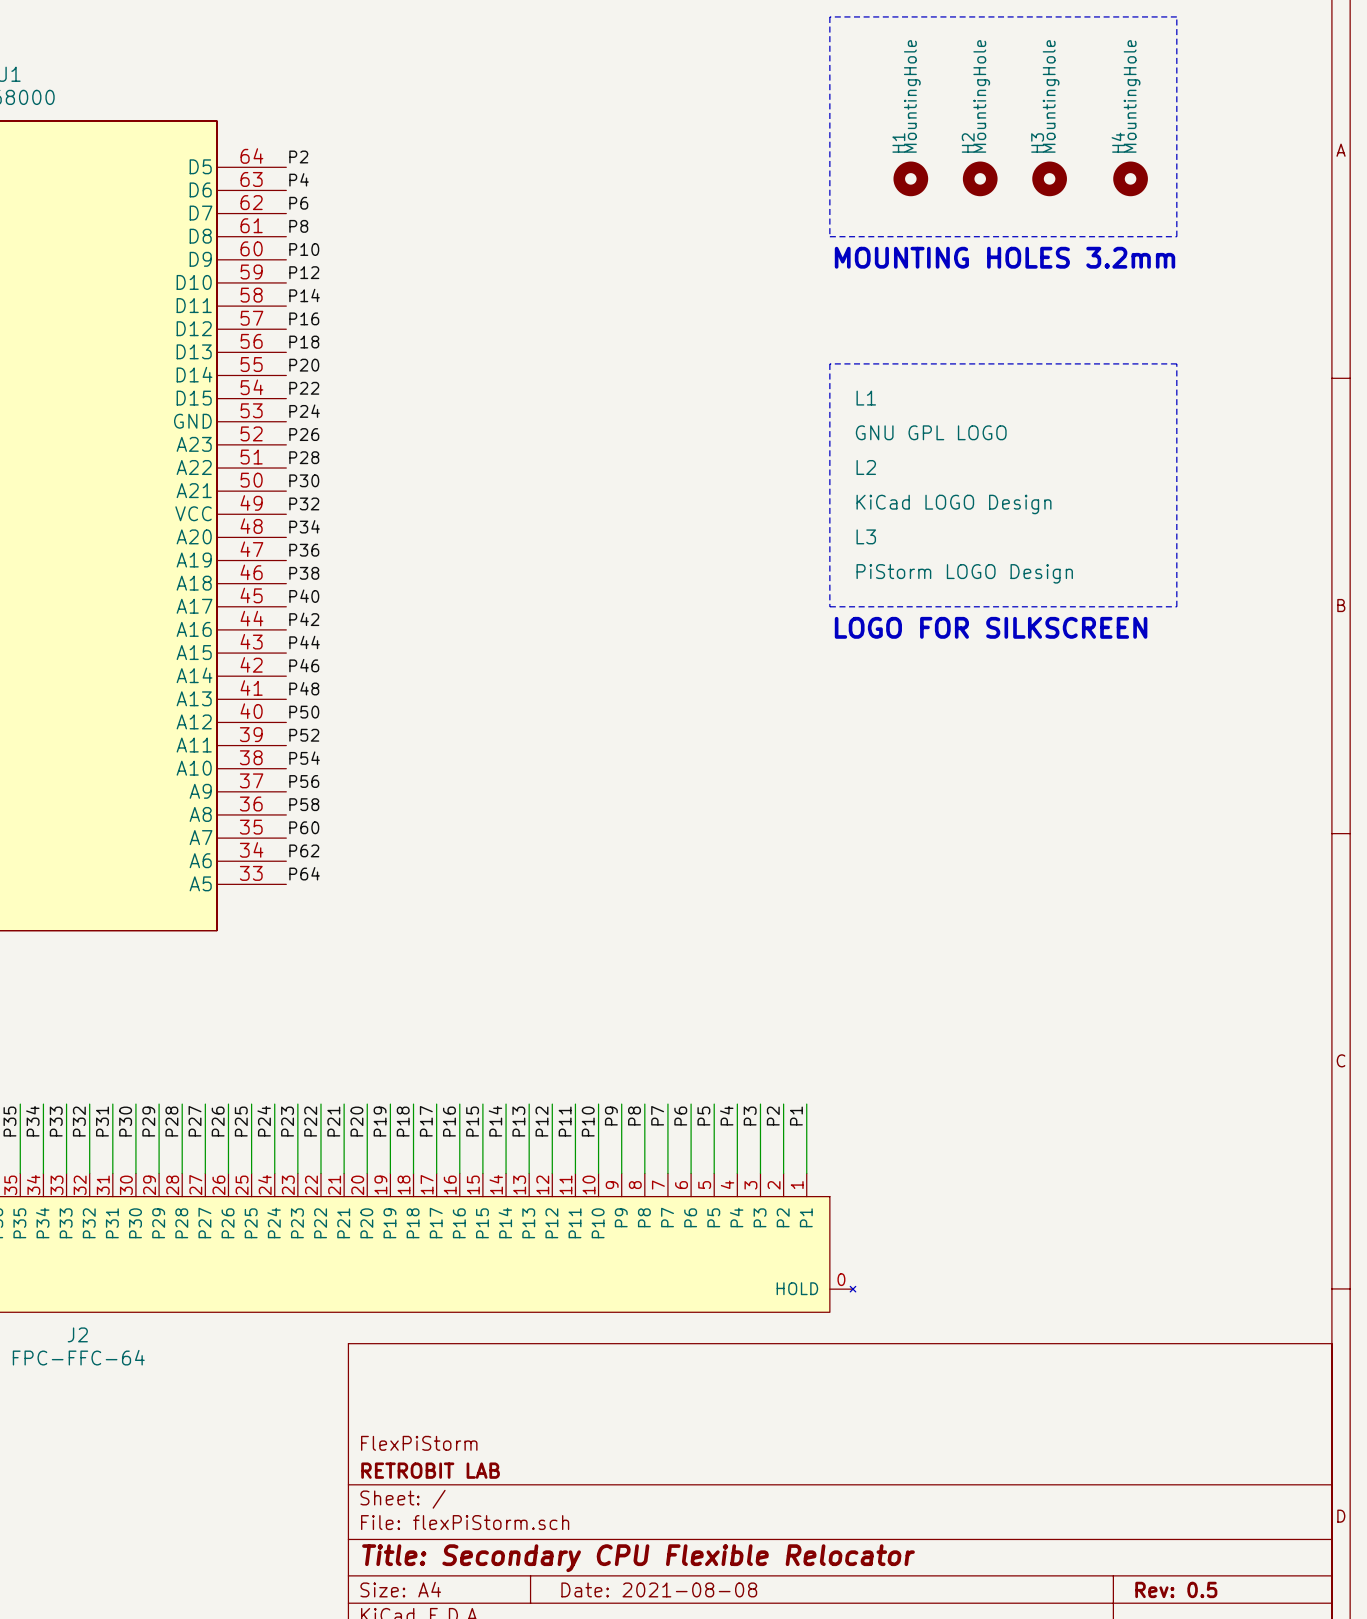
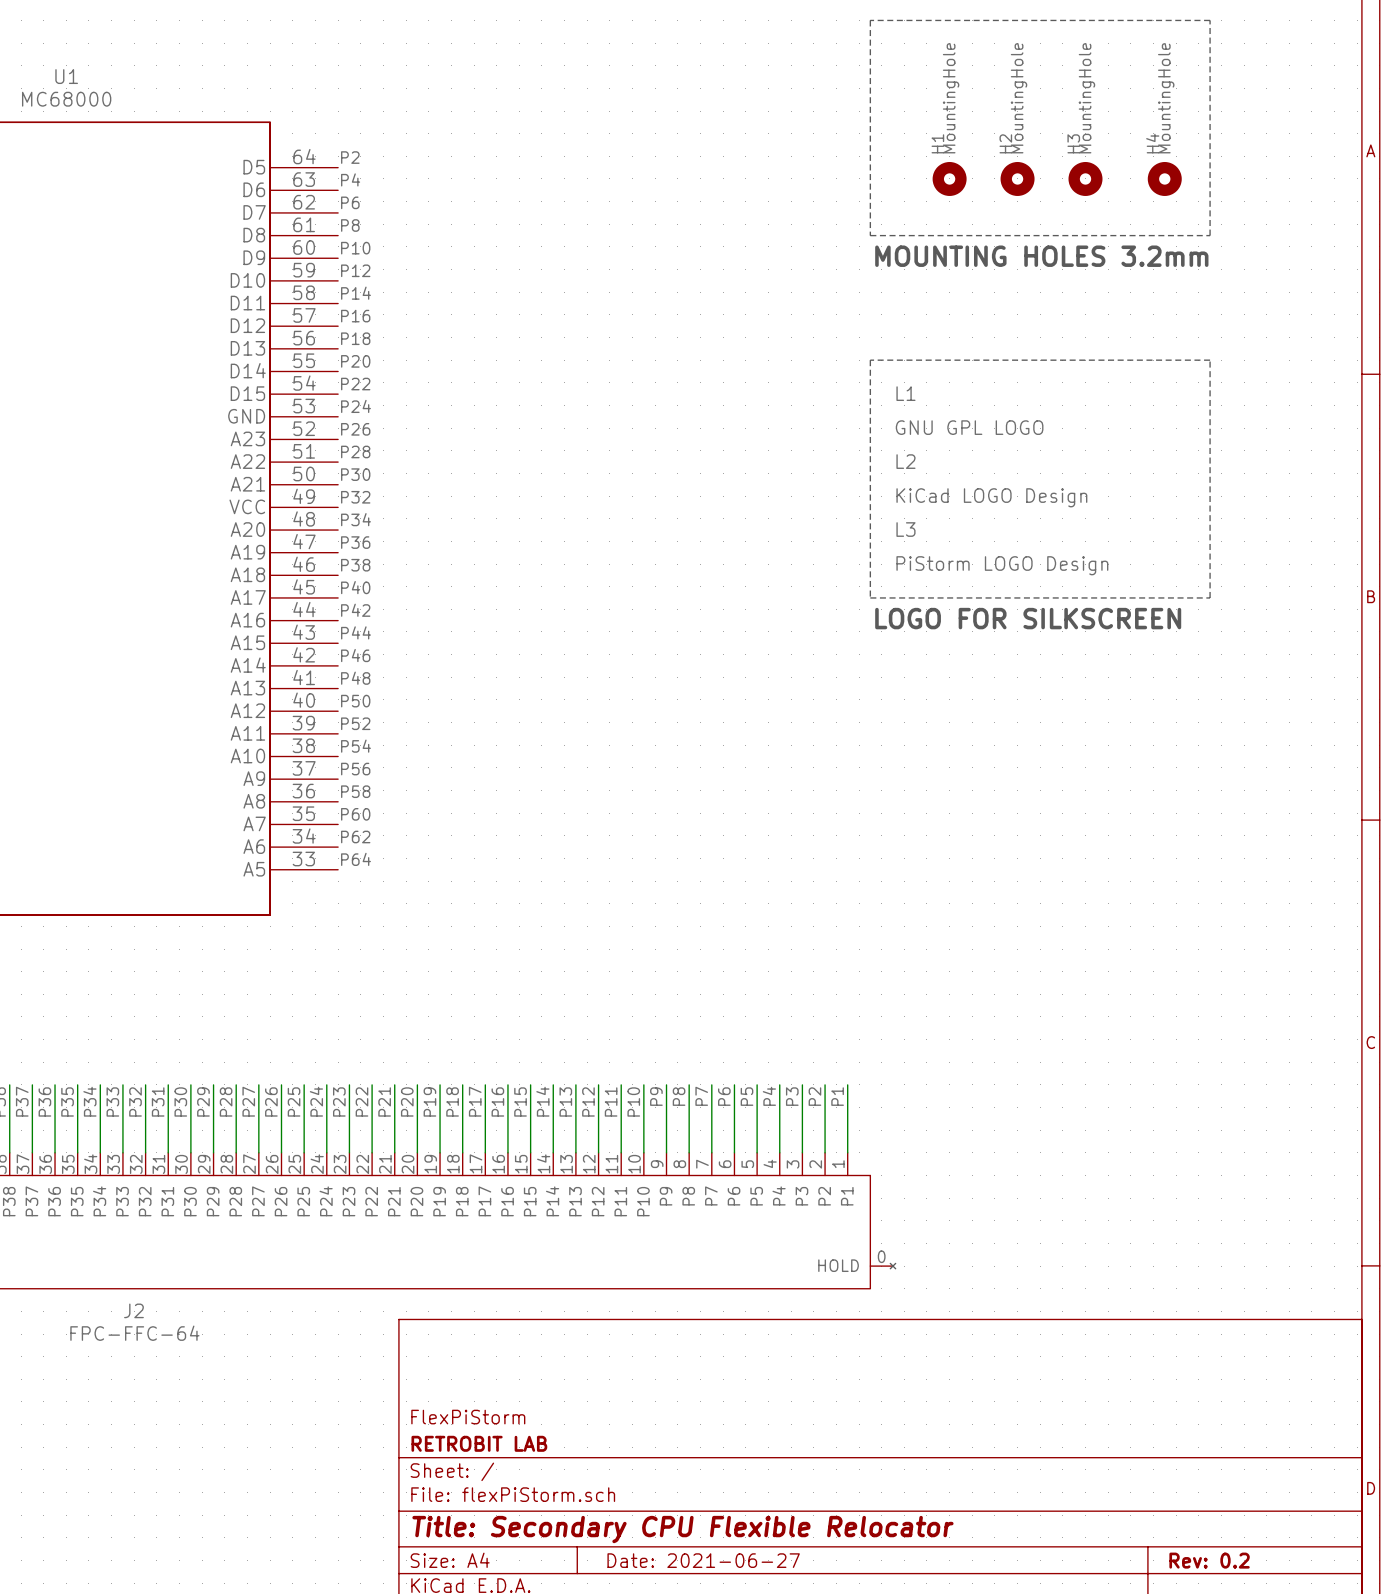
title block: Date: 2021-08-08 (659, 1589) -> Date: 2021-06-27 (703, 1560)
title block: Rev: 0.5 (1176, 1589) -> Rev: 0.2 (1209, 1560)

